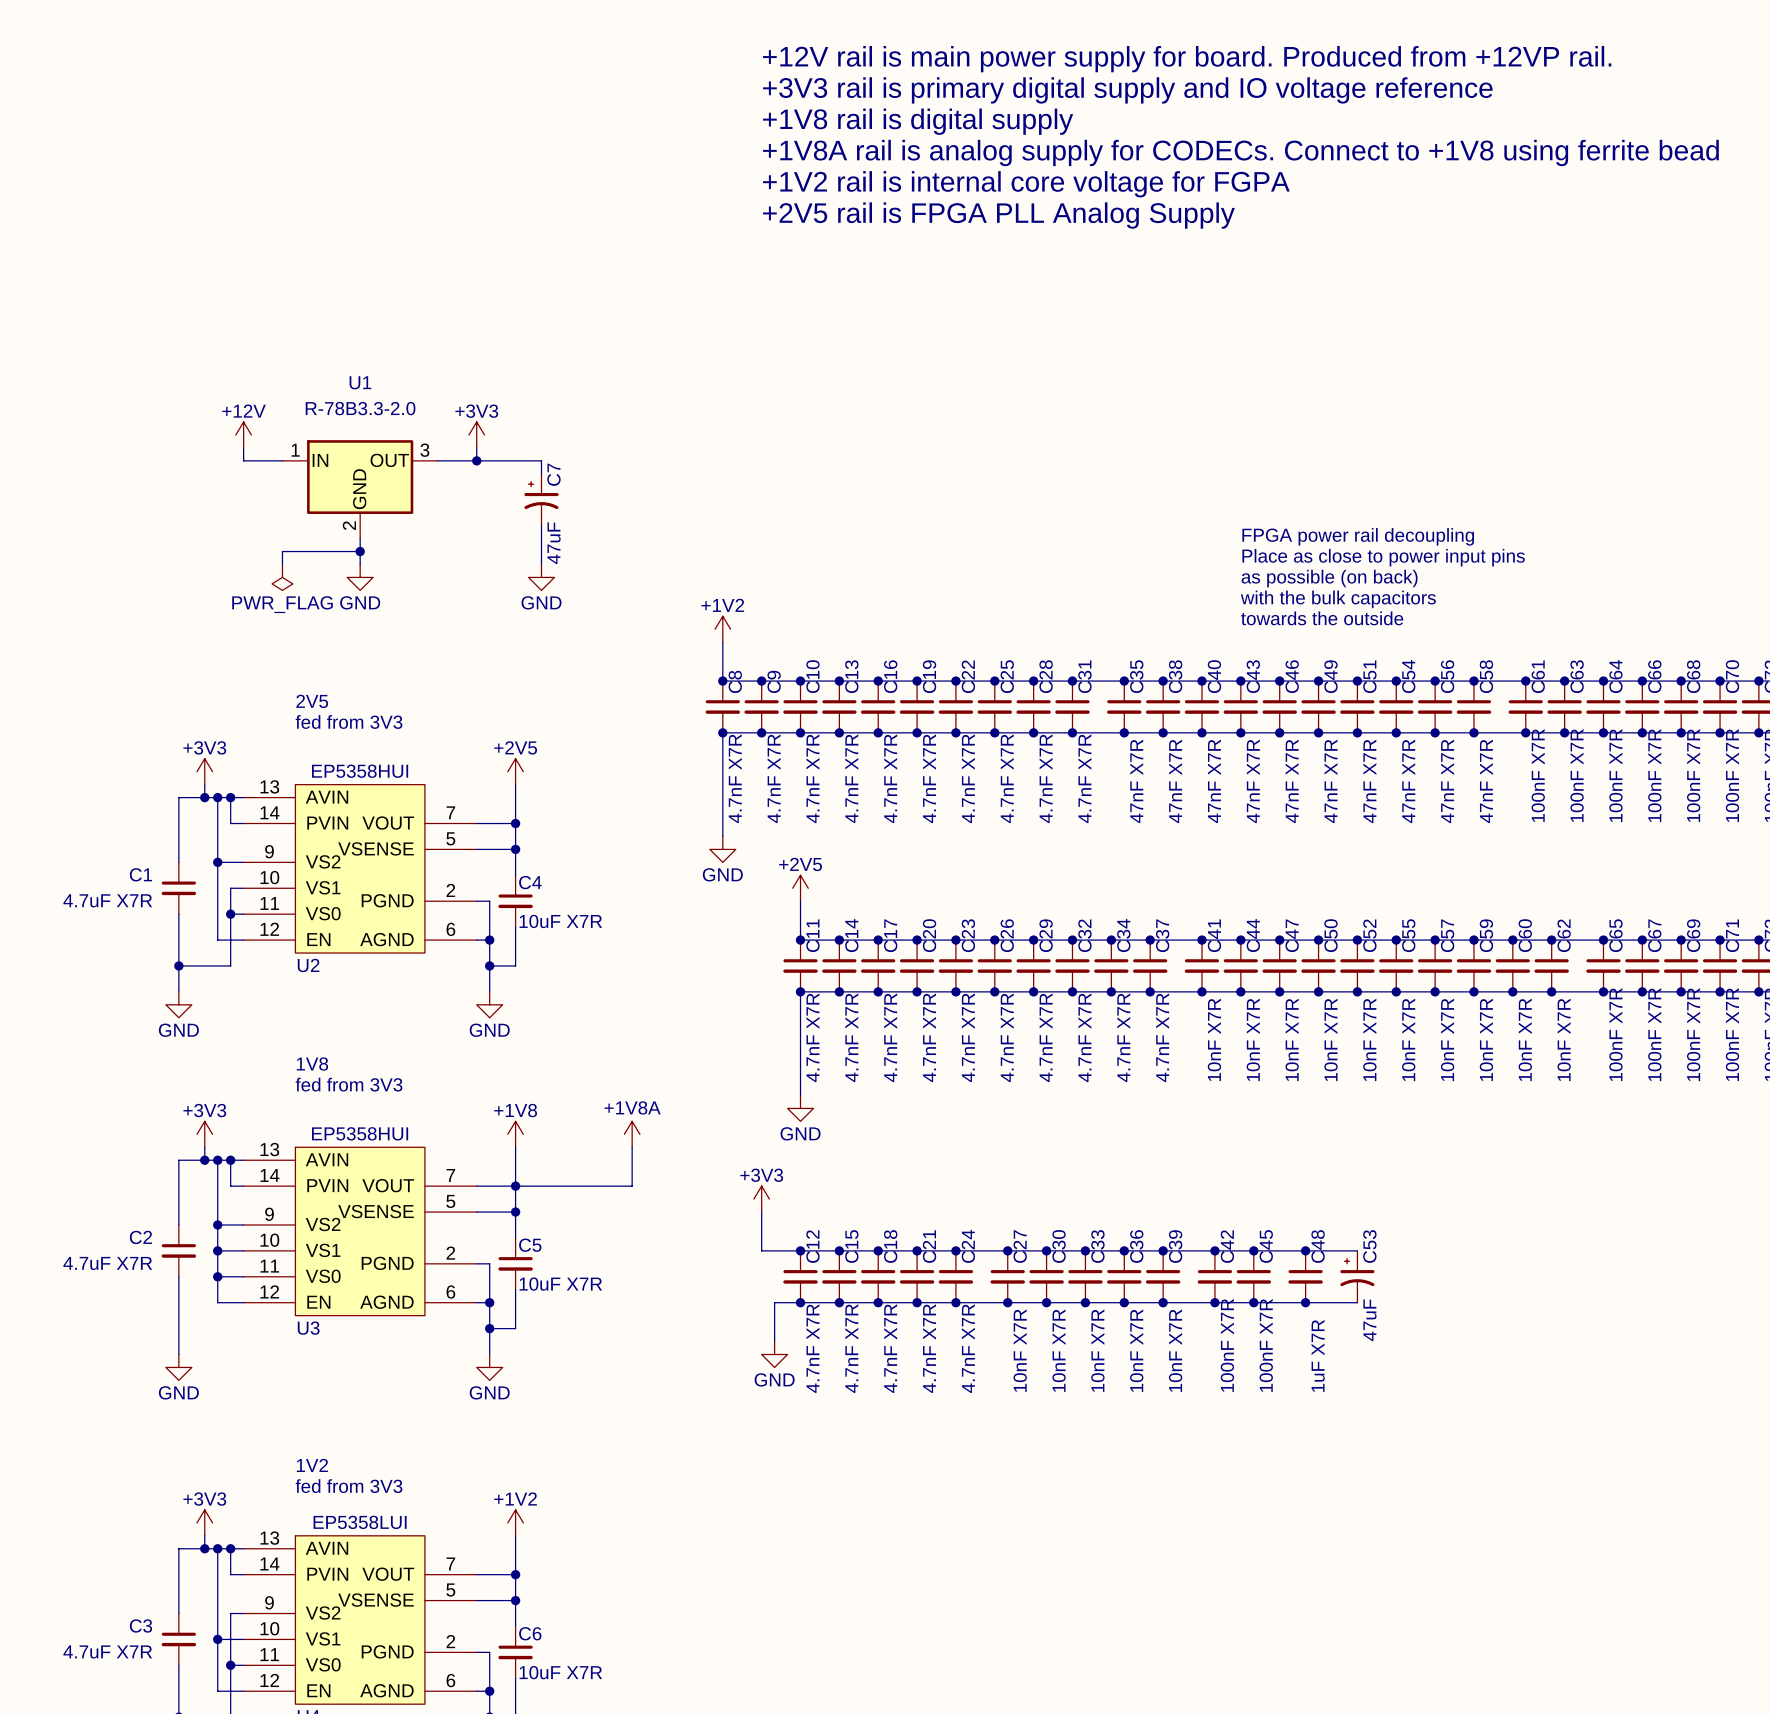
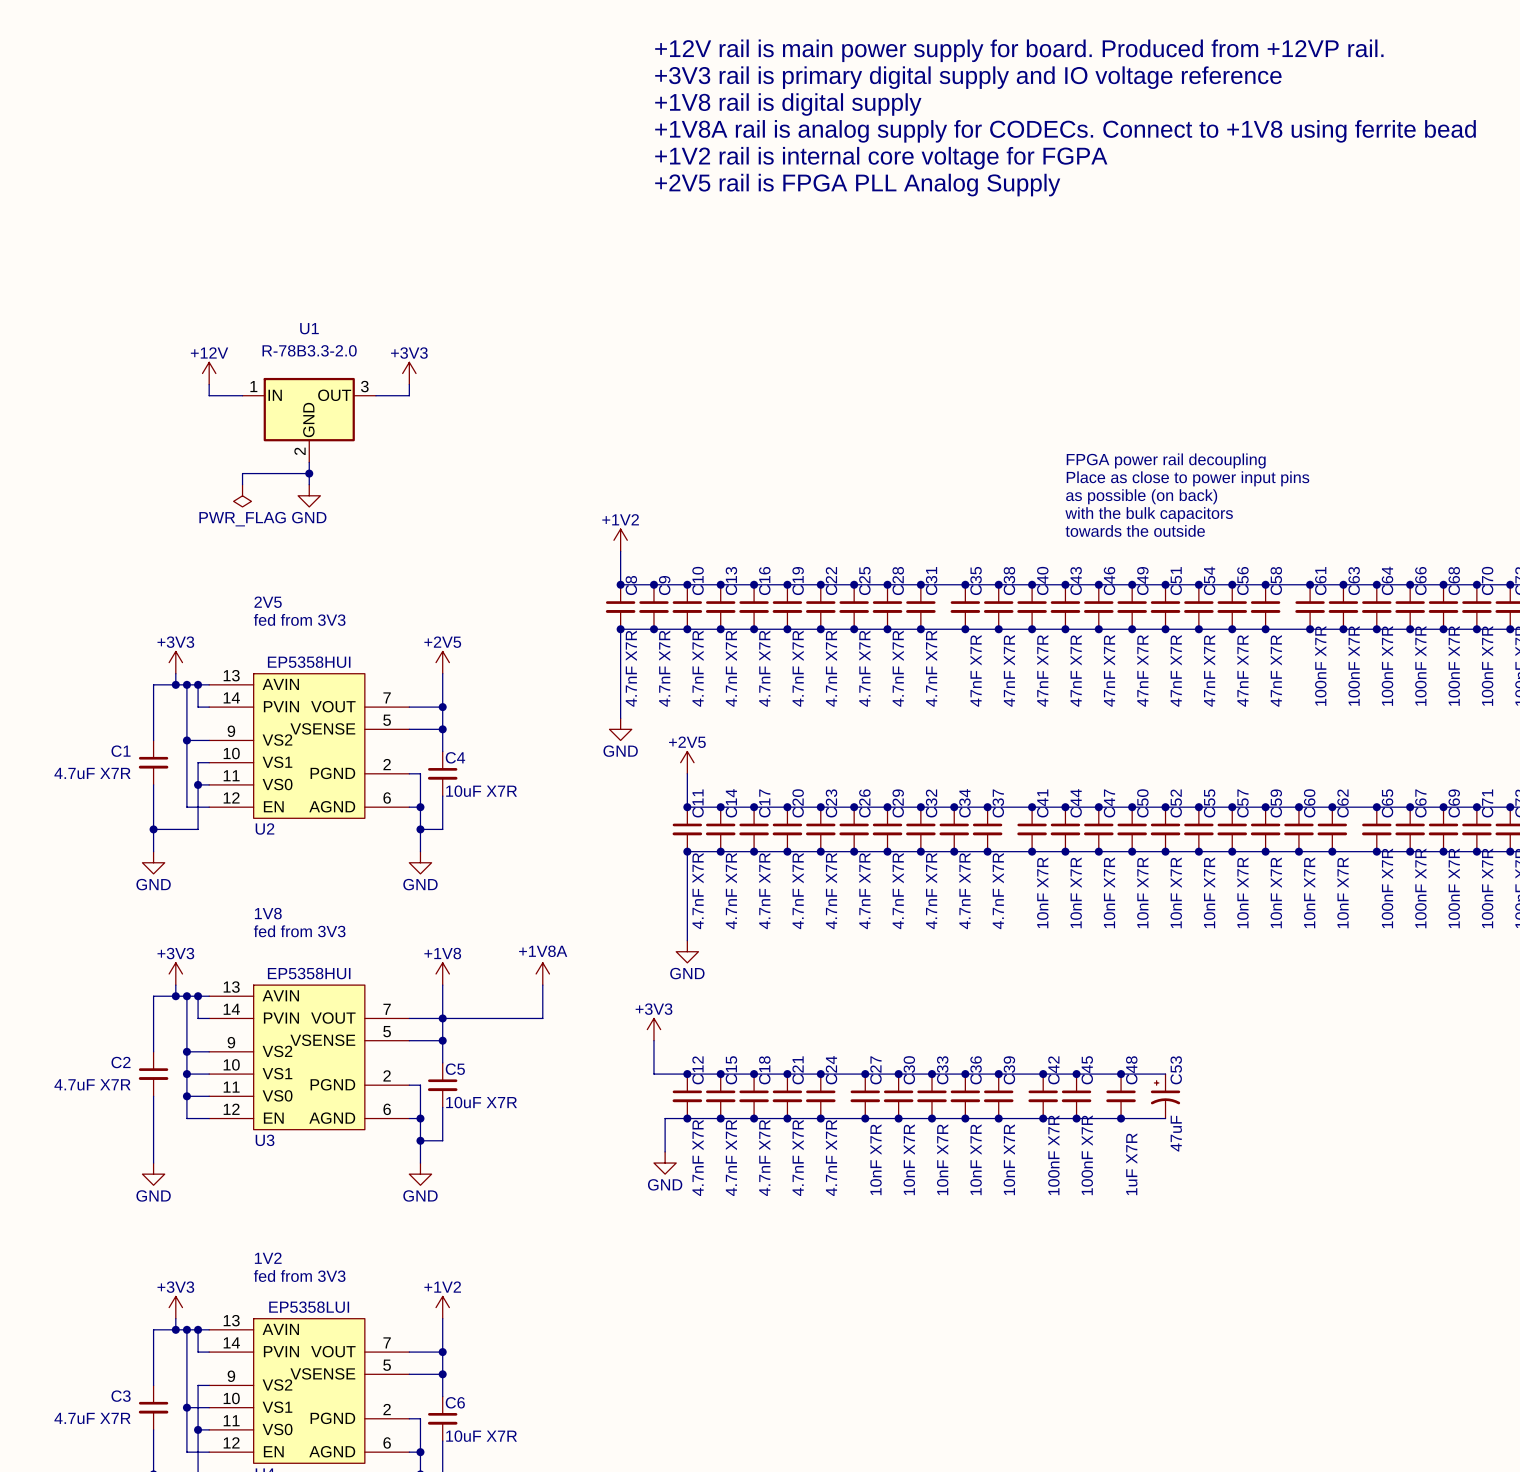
wire: (476, 460) (541, 460) (541, 473) -> none
junction: (476, 460) -> none
C7: 47uF (541, 499) -> none
wire: (541, 525) (541, 564) -> none
power symbol: GND (541, 577) -> none

